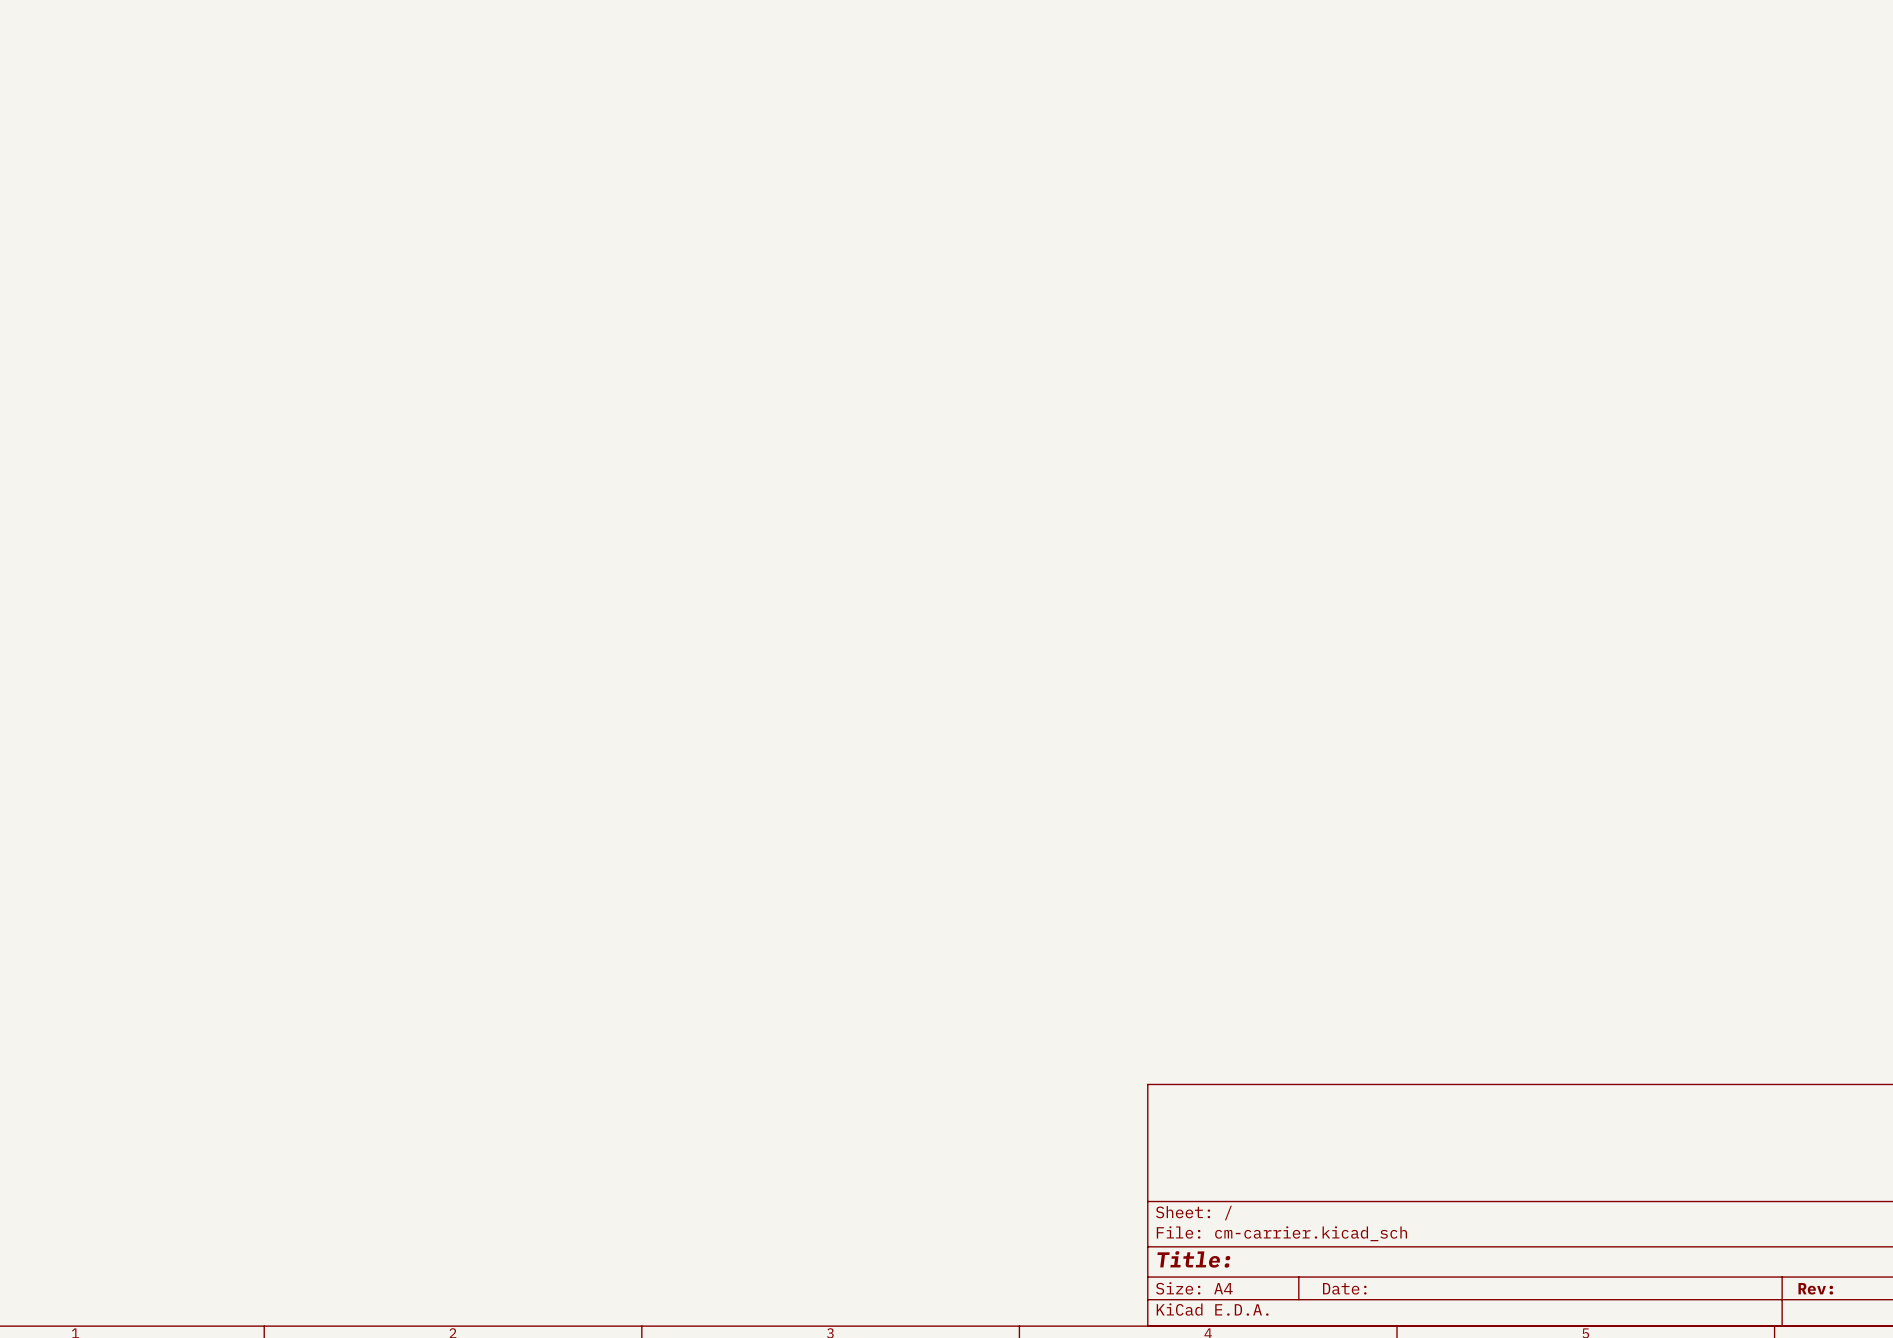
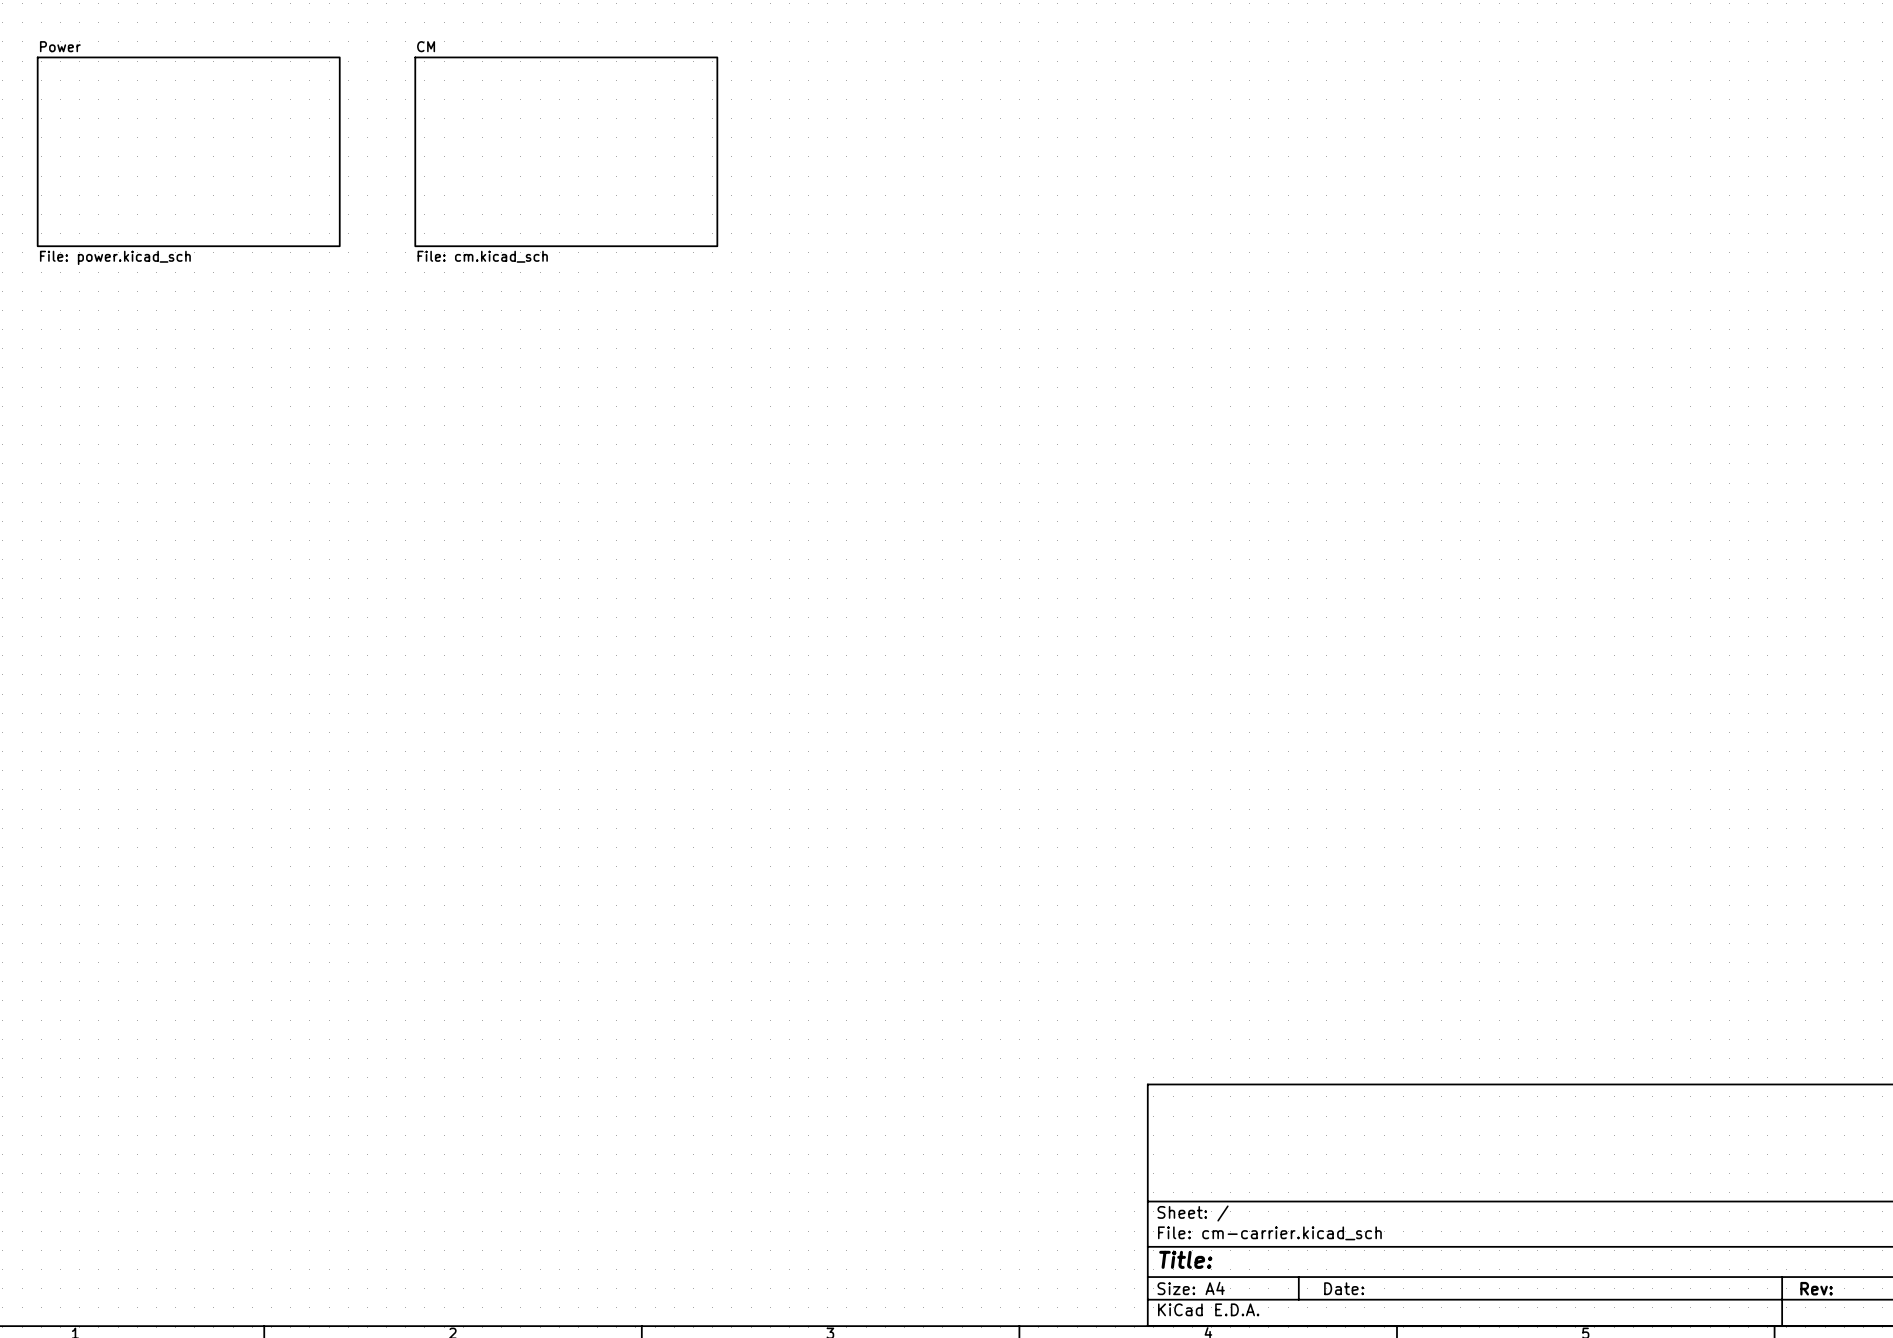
sheet Power: none -> File: power.kicad_sch (188, 151)
sheet CM: none -> File: cm.kicad_sch (566, 151)

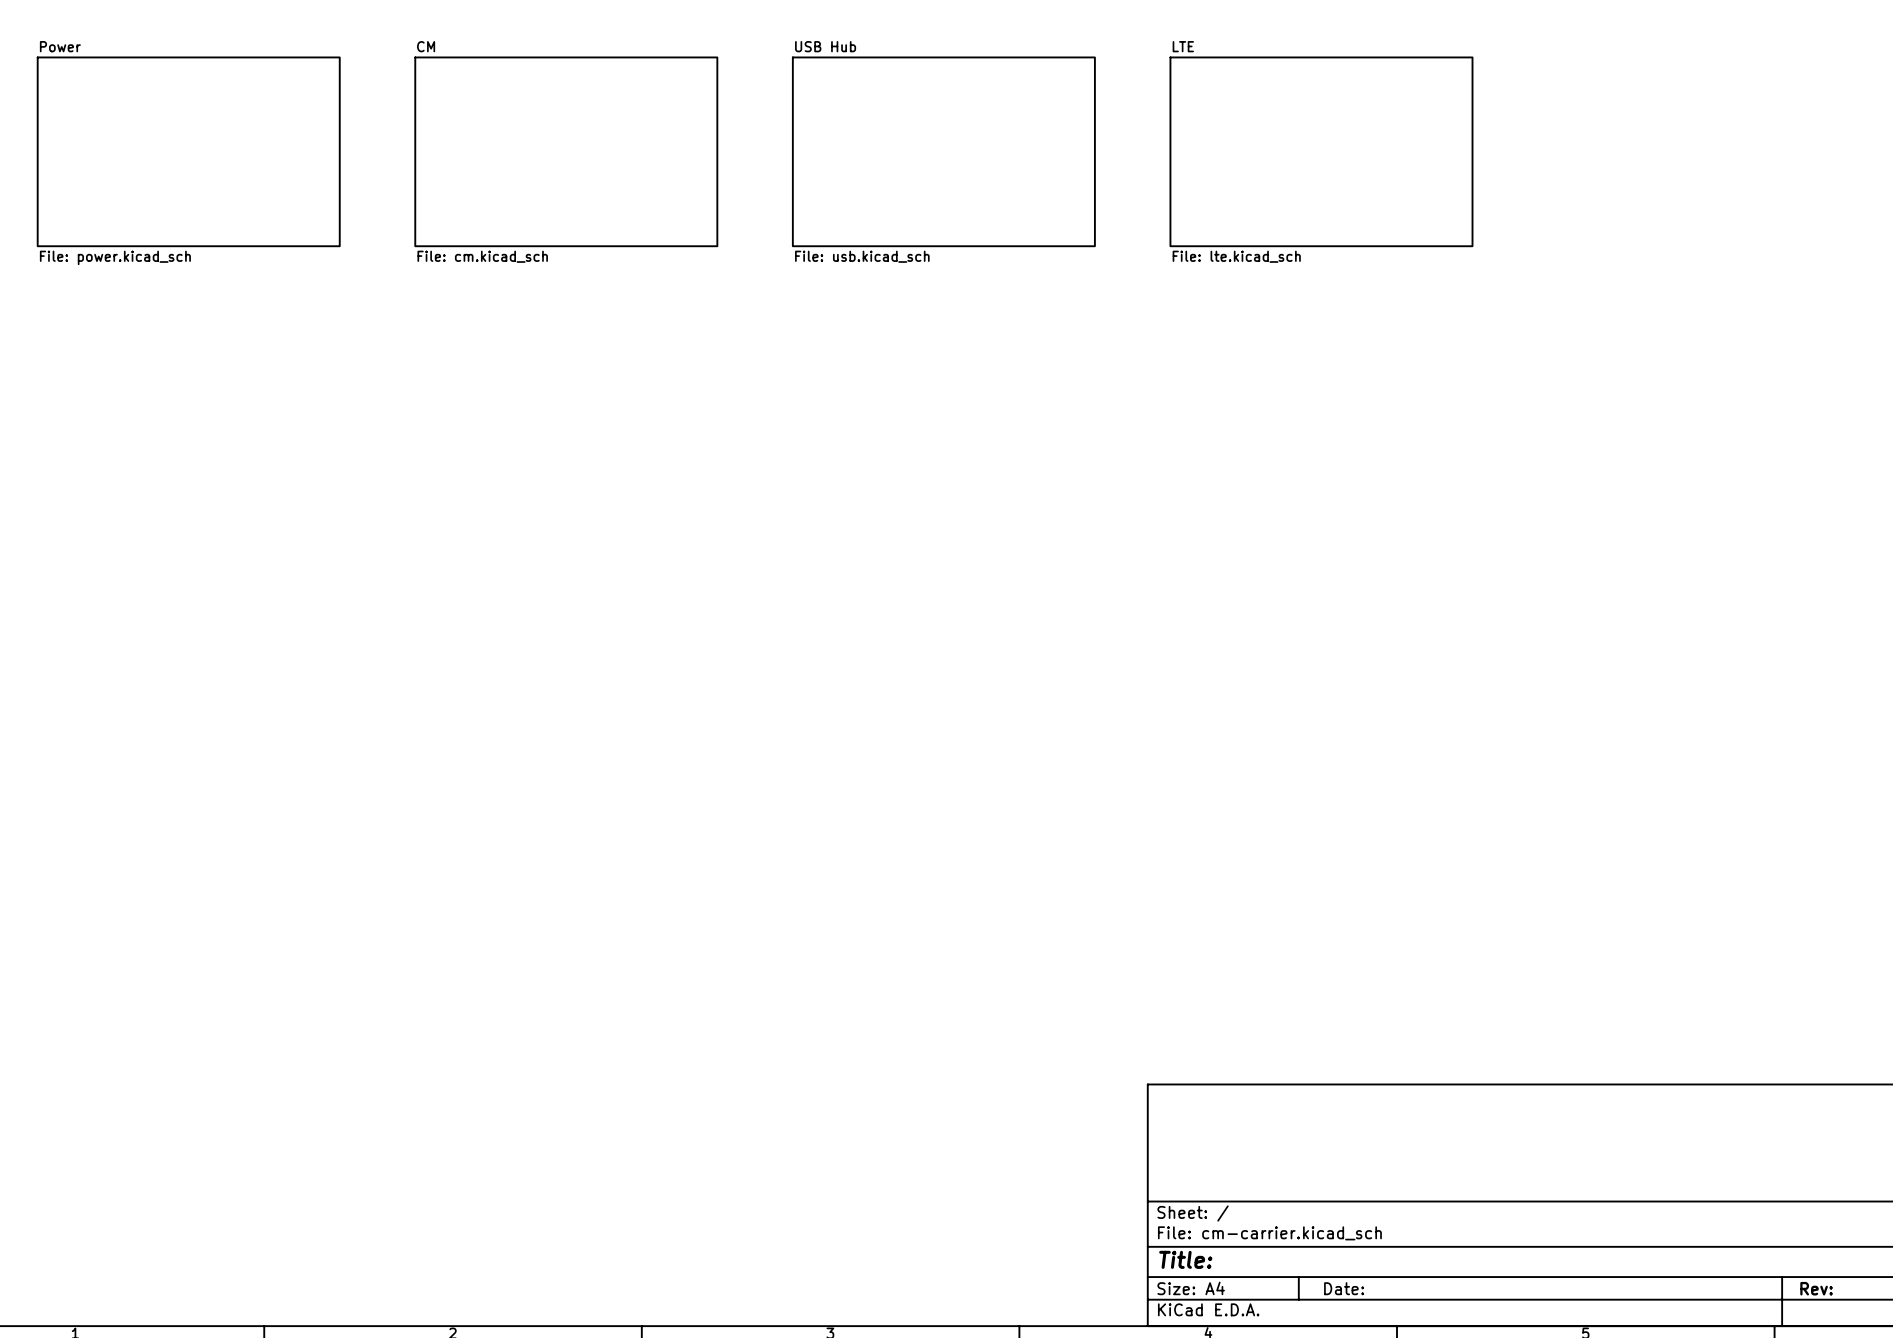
sheet USB Hub: none -> File: usb.kicad_sch (943, 151)
sheet LTE: none -> File: lte.kicad_sch (1321, 151)

